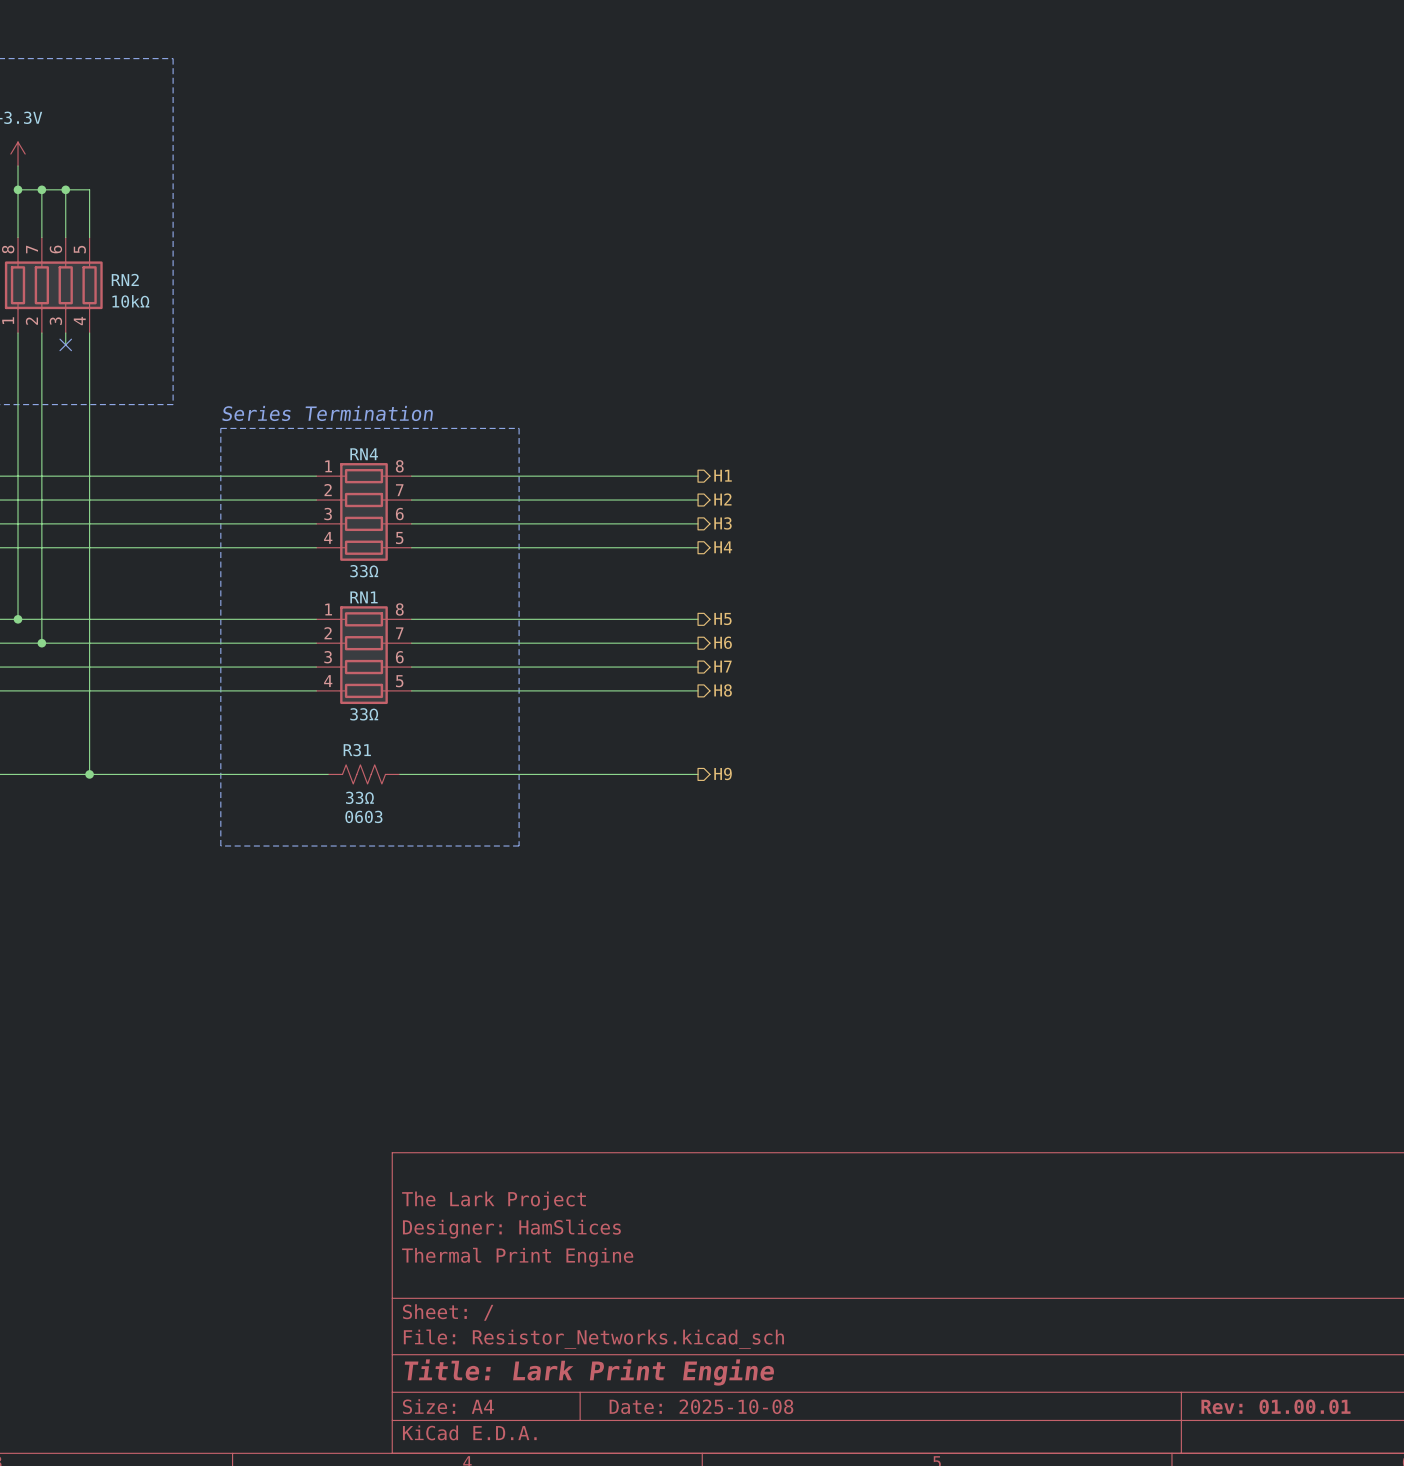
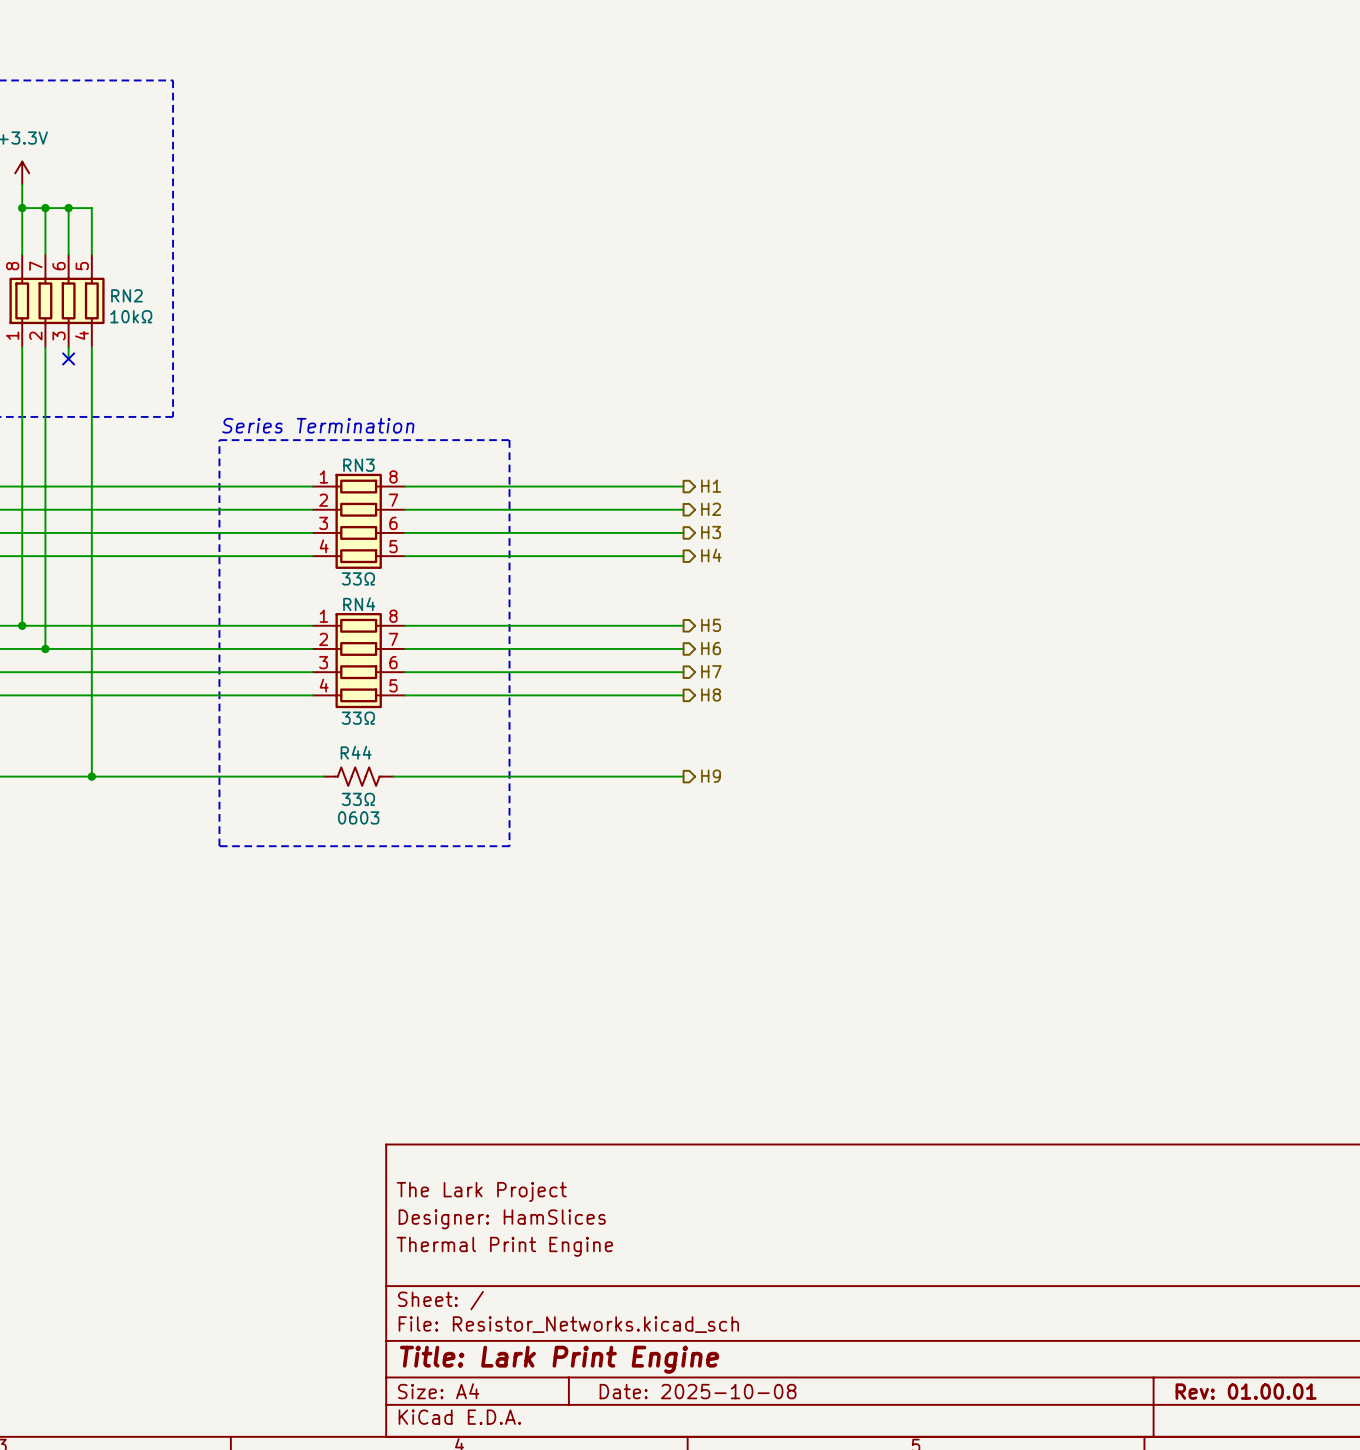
RN4 name: RN4 (364, 454) -> RN3 (358, 465)
RN1 name: RN1 (364, 597) -> RN4 (359, 604)
R31 name: R31 (357, 750) -> R44 (356, 752)

